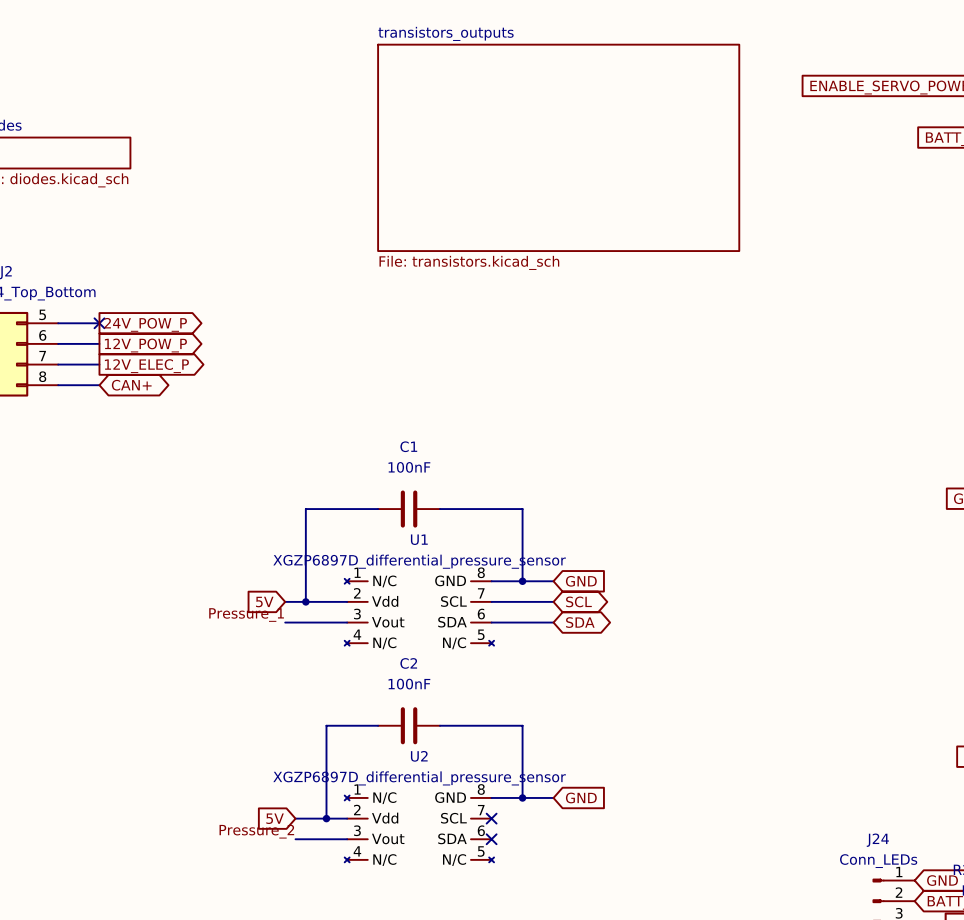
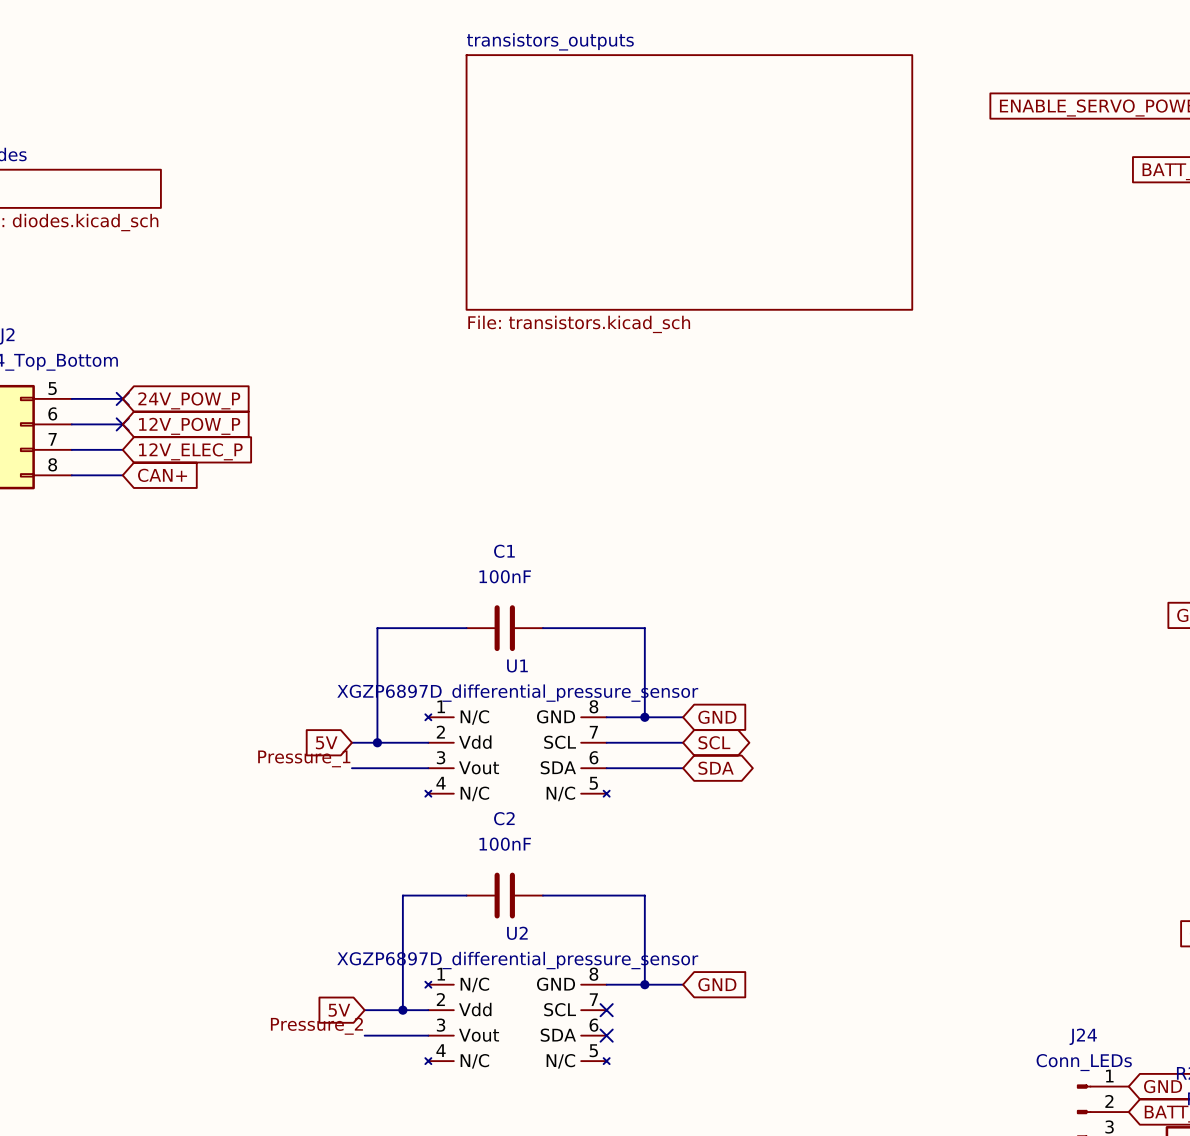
global label shape: output (145, 324) -> input (189, 400)
no-connect mark: none -> (122, 424)
global label shape: output (145, 345) -> input (189, 426)
global label shape: output (146, 366) -> input (190, 451)
global label shape: bidirectional (131, 385) -> input (162, 475)

